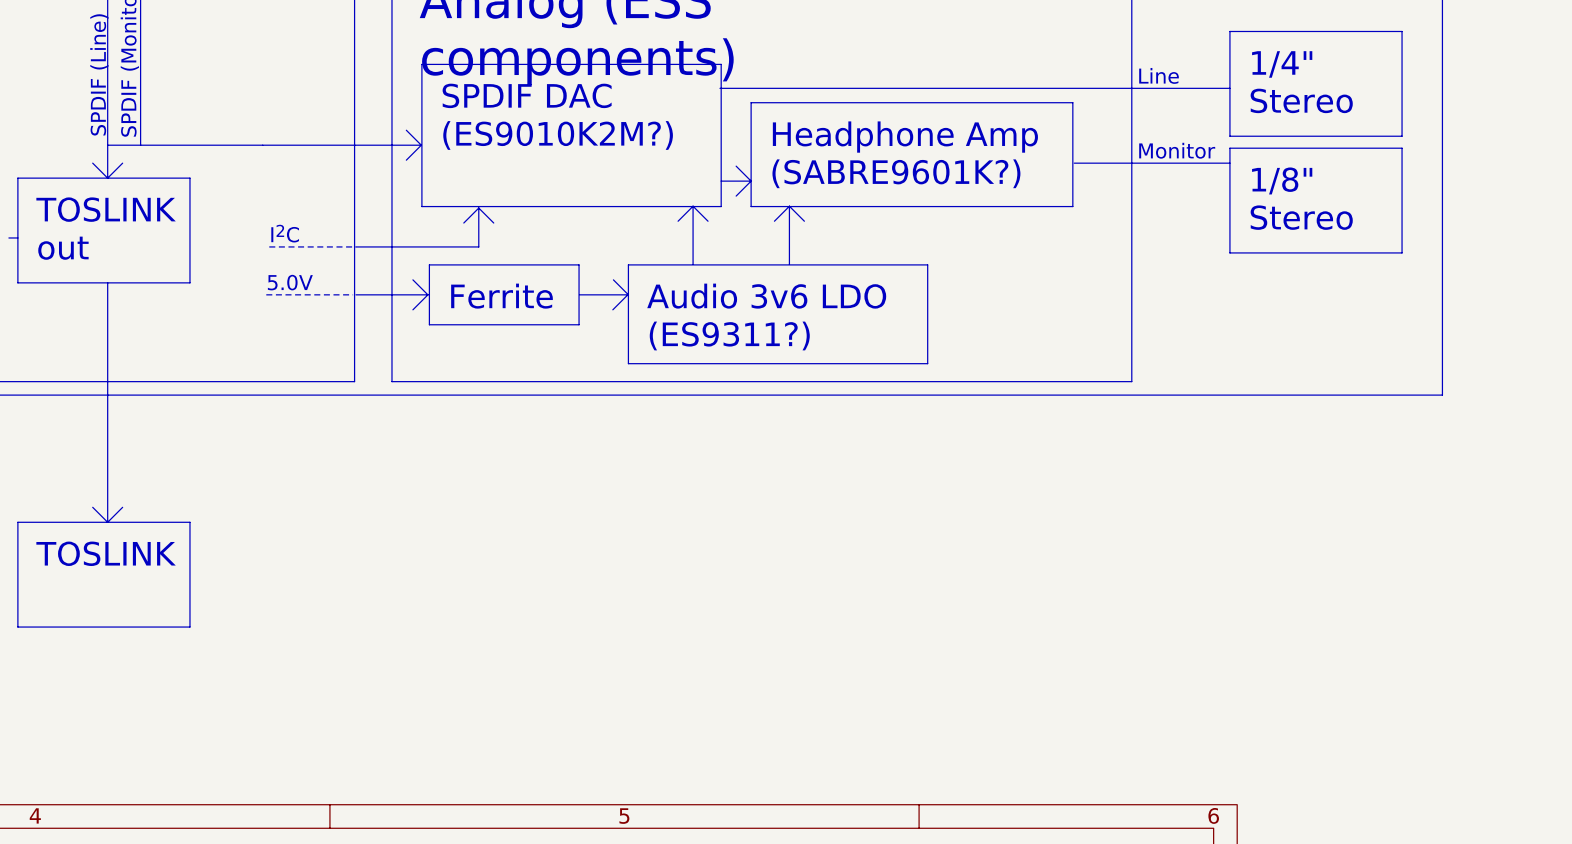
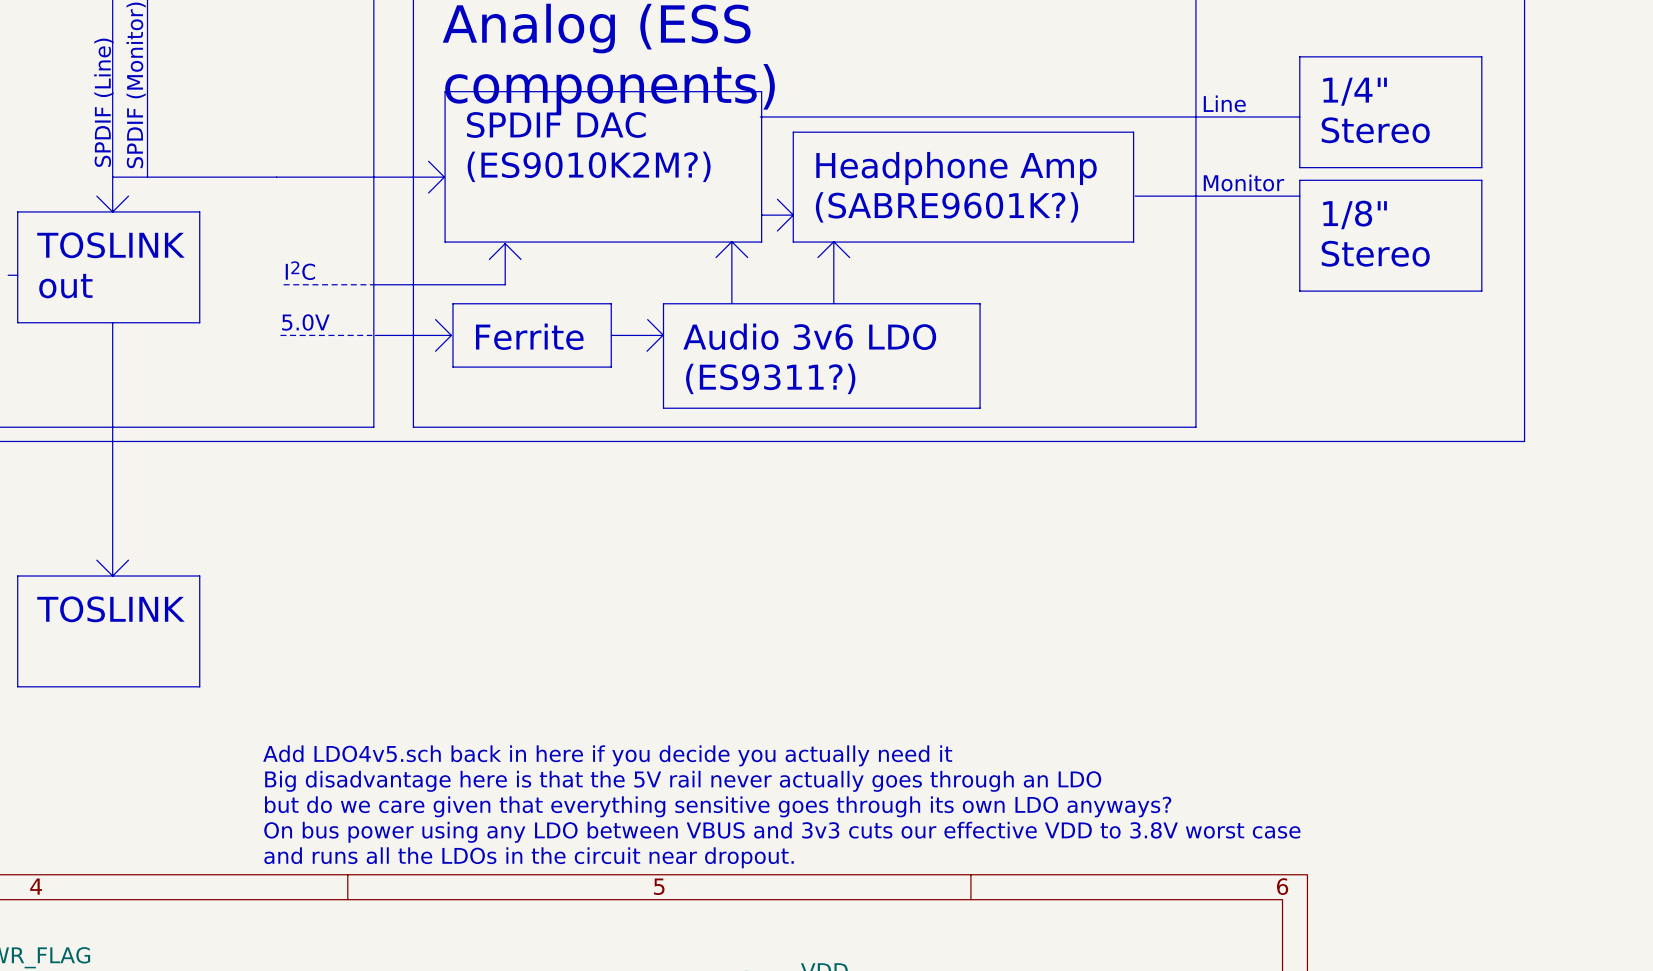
text: none -> Add LDO4v5.sch back in here if you decide you actually need it (607, 755)
text: none -> Big disadvantage here is that the 5V rail never actually goes through an LDO (683, 781)
text: none -> but do we care given that everything sensitive goes through its own LDO anyways? (718, 806)
text: none -> On bus power using any LDO between VBUS and 3v3 cuts our effective VDD to 3.8V worst case (782, 832)
text: none -> and runs all the LDOs in the circuit near dropout. (529, 857)

